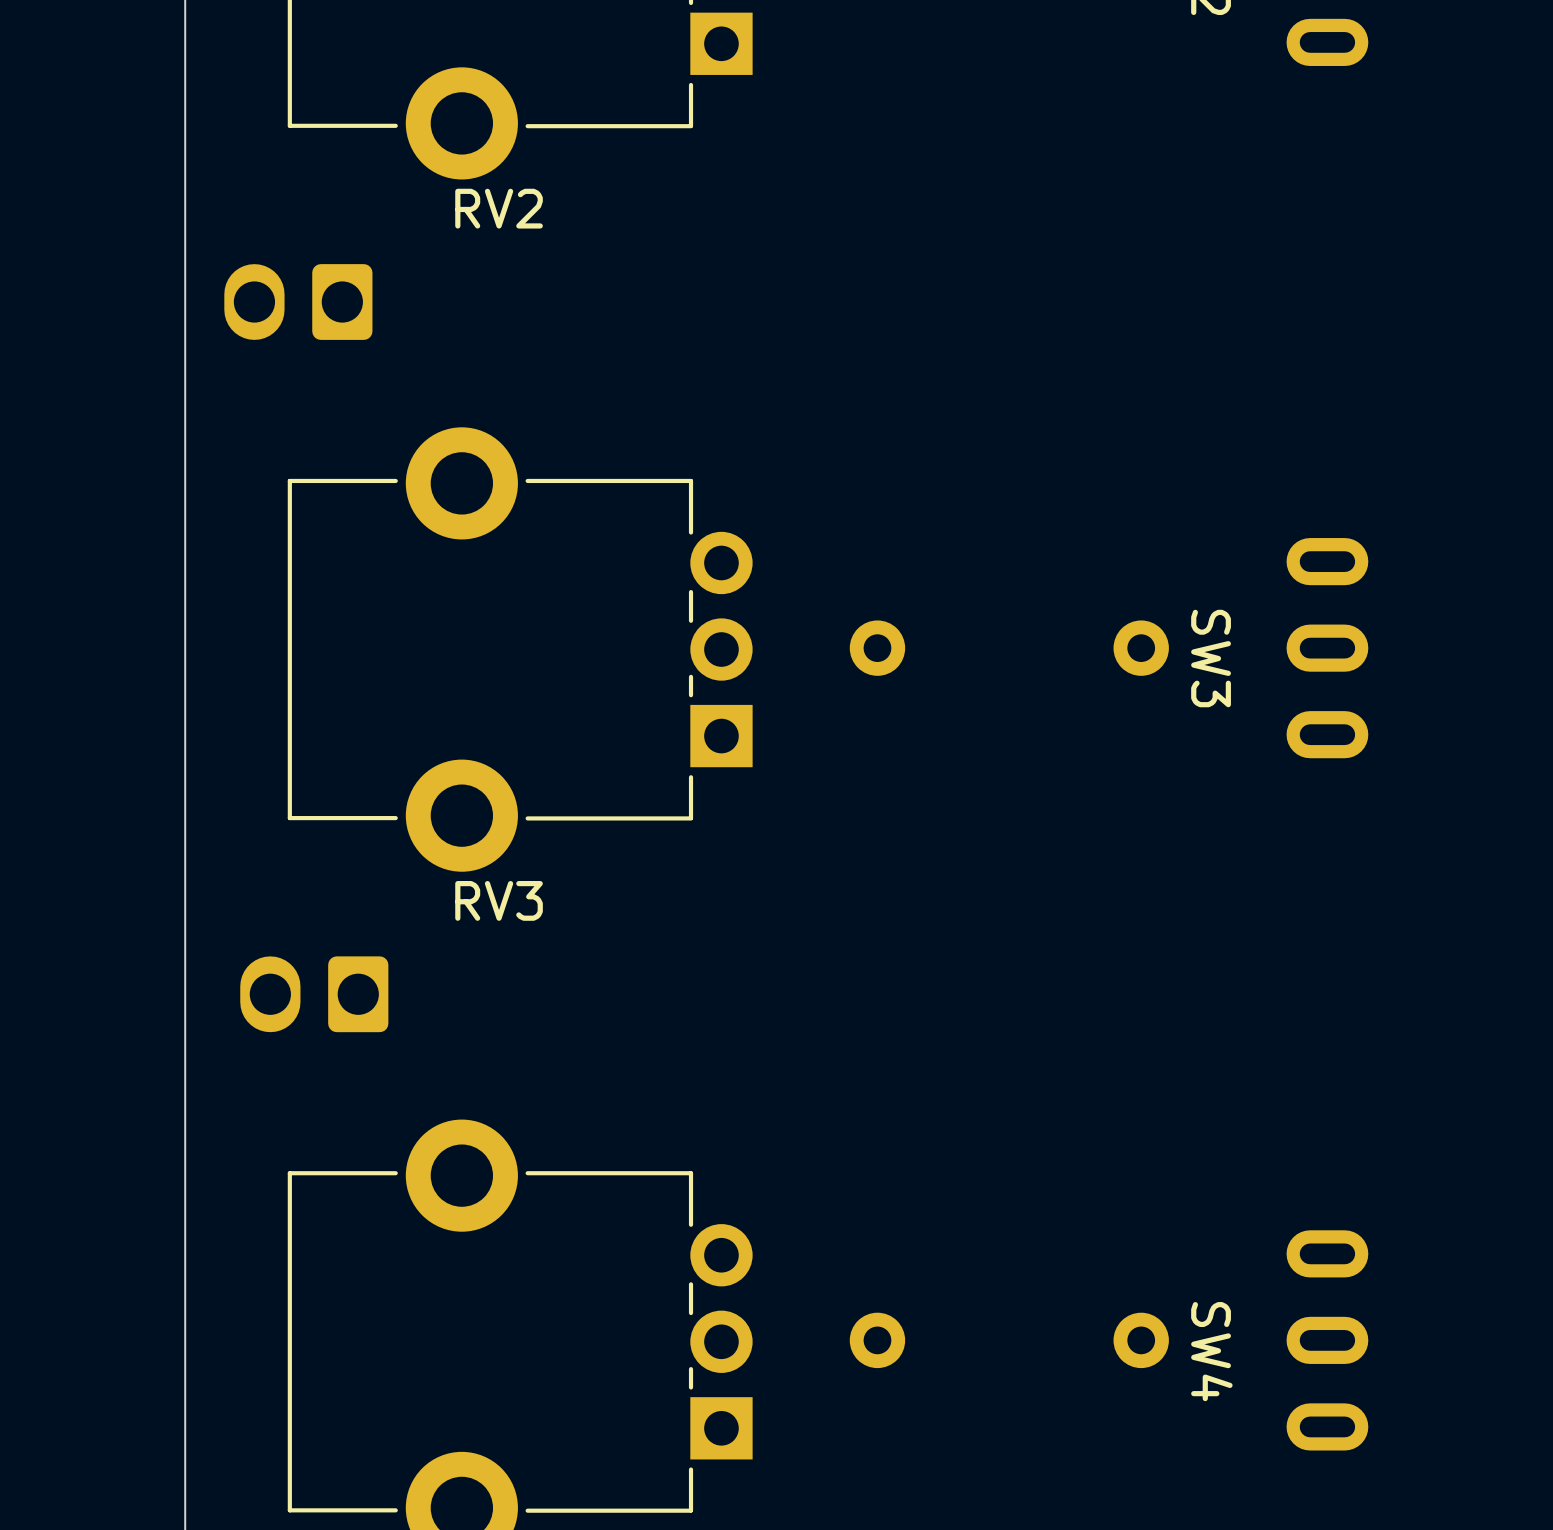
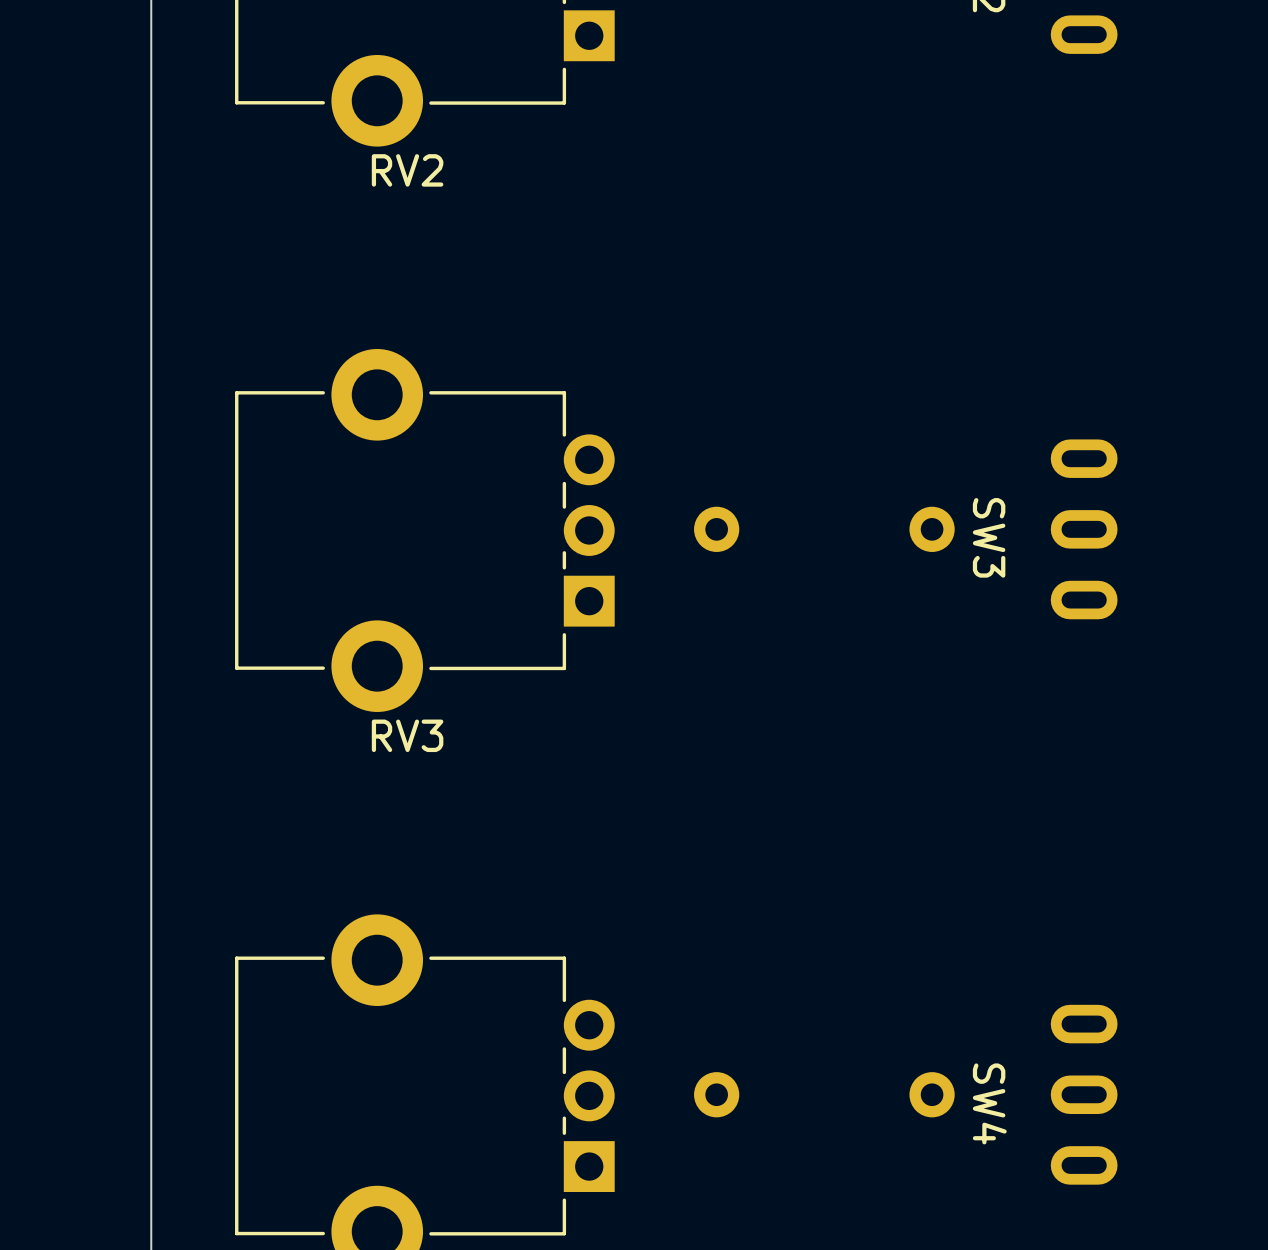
part: (298, 302) -> none
part: (314, 994) -> none

